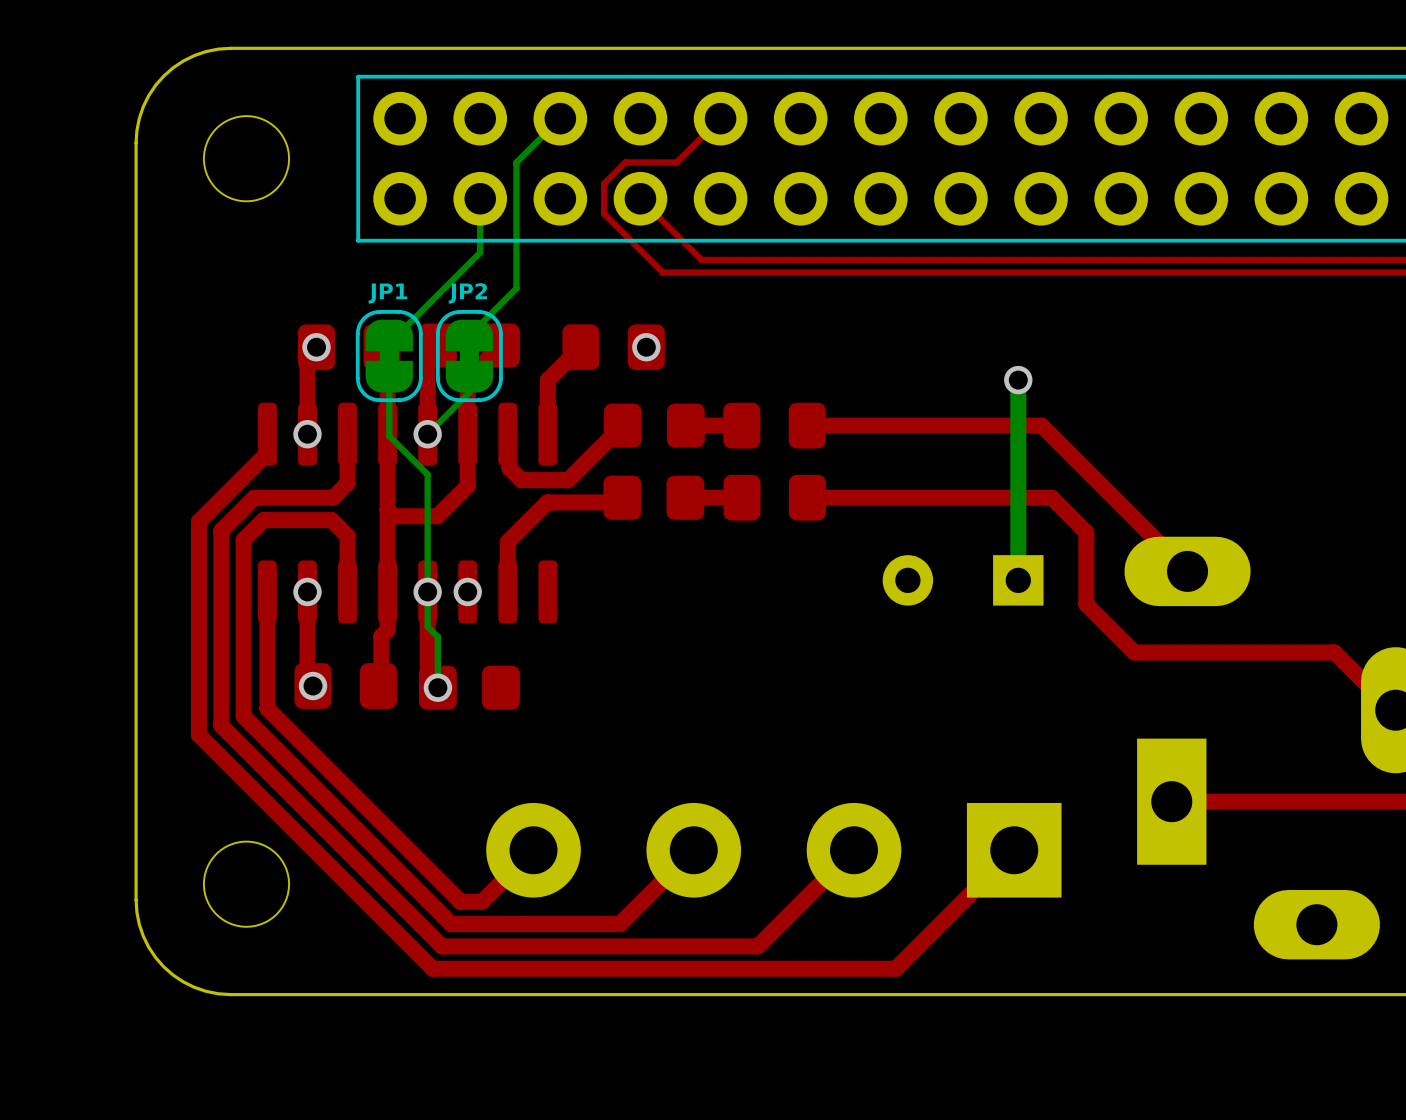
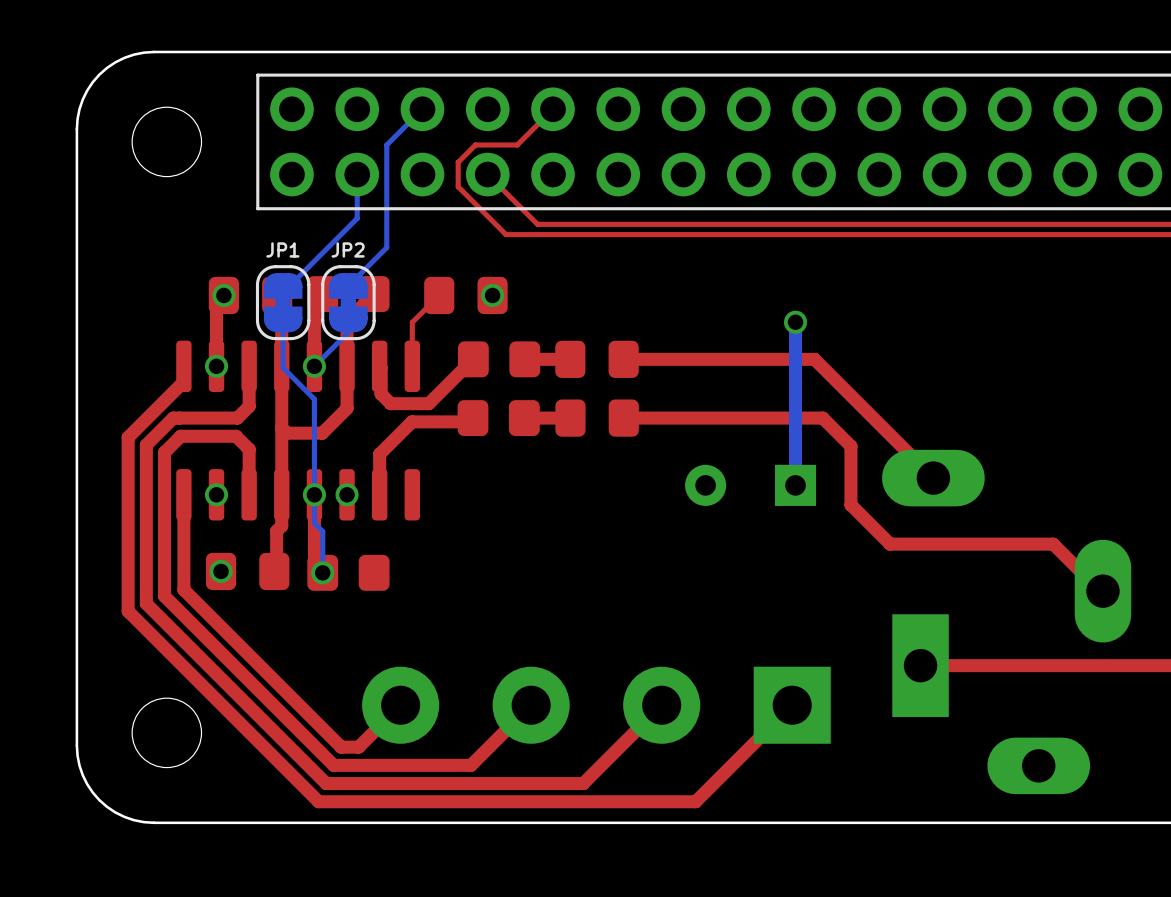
top track width: thick (580, 347) (547, 380) (547, 434) -> thin (439, 295) (412, 322) (412, 366)
top track: (307, 591) (307, 680) -> none

